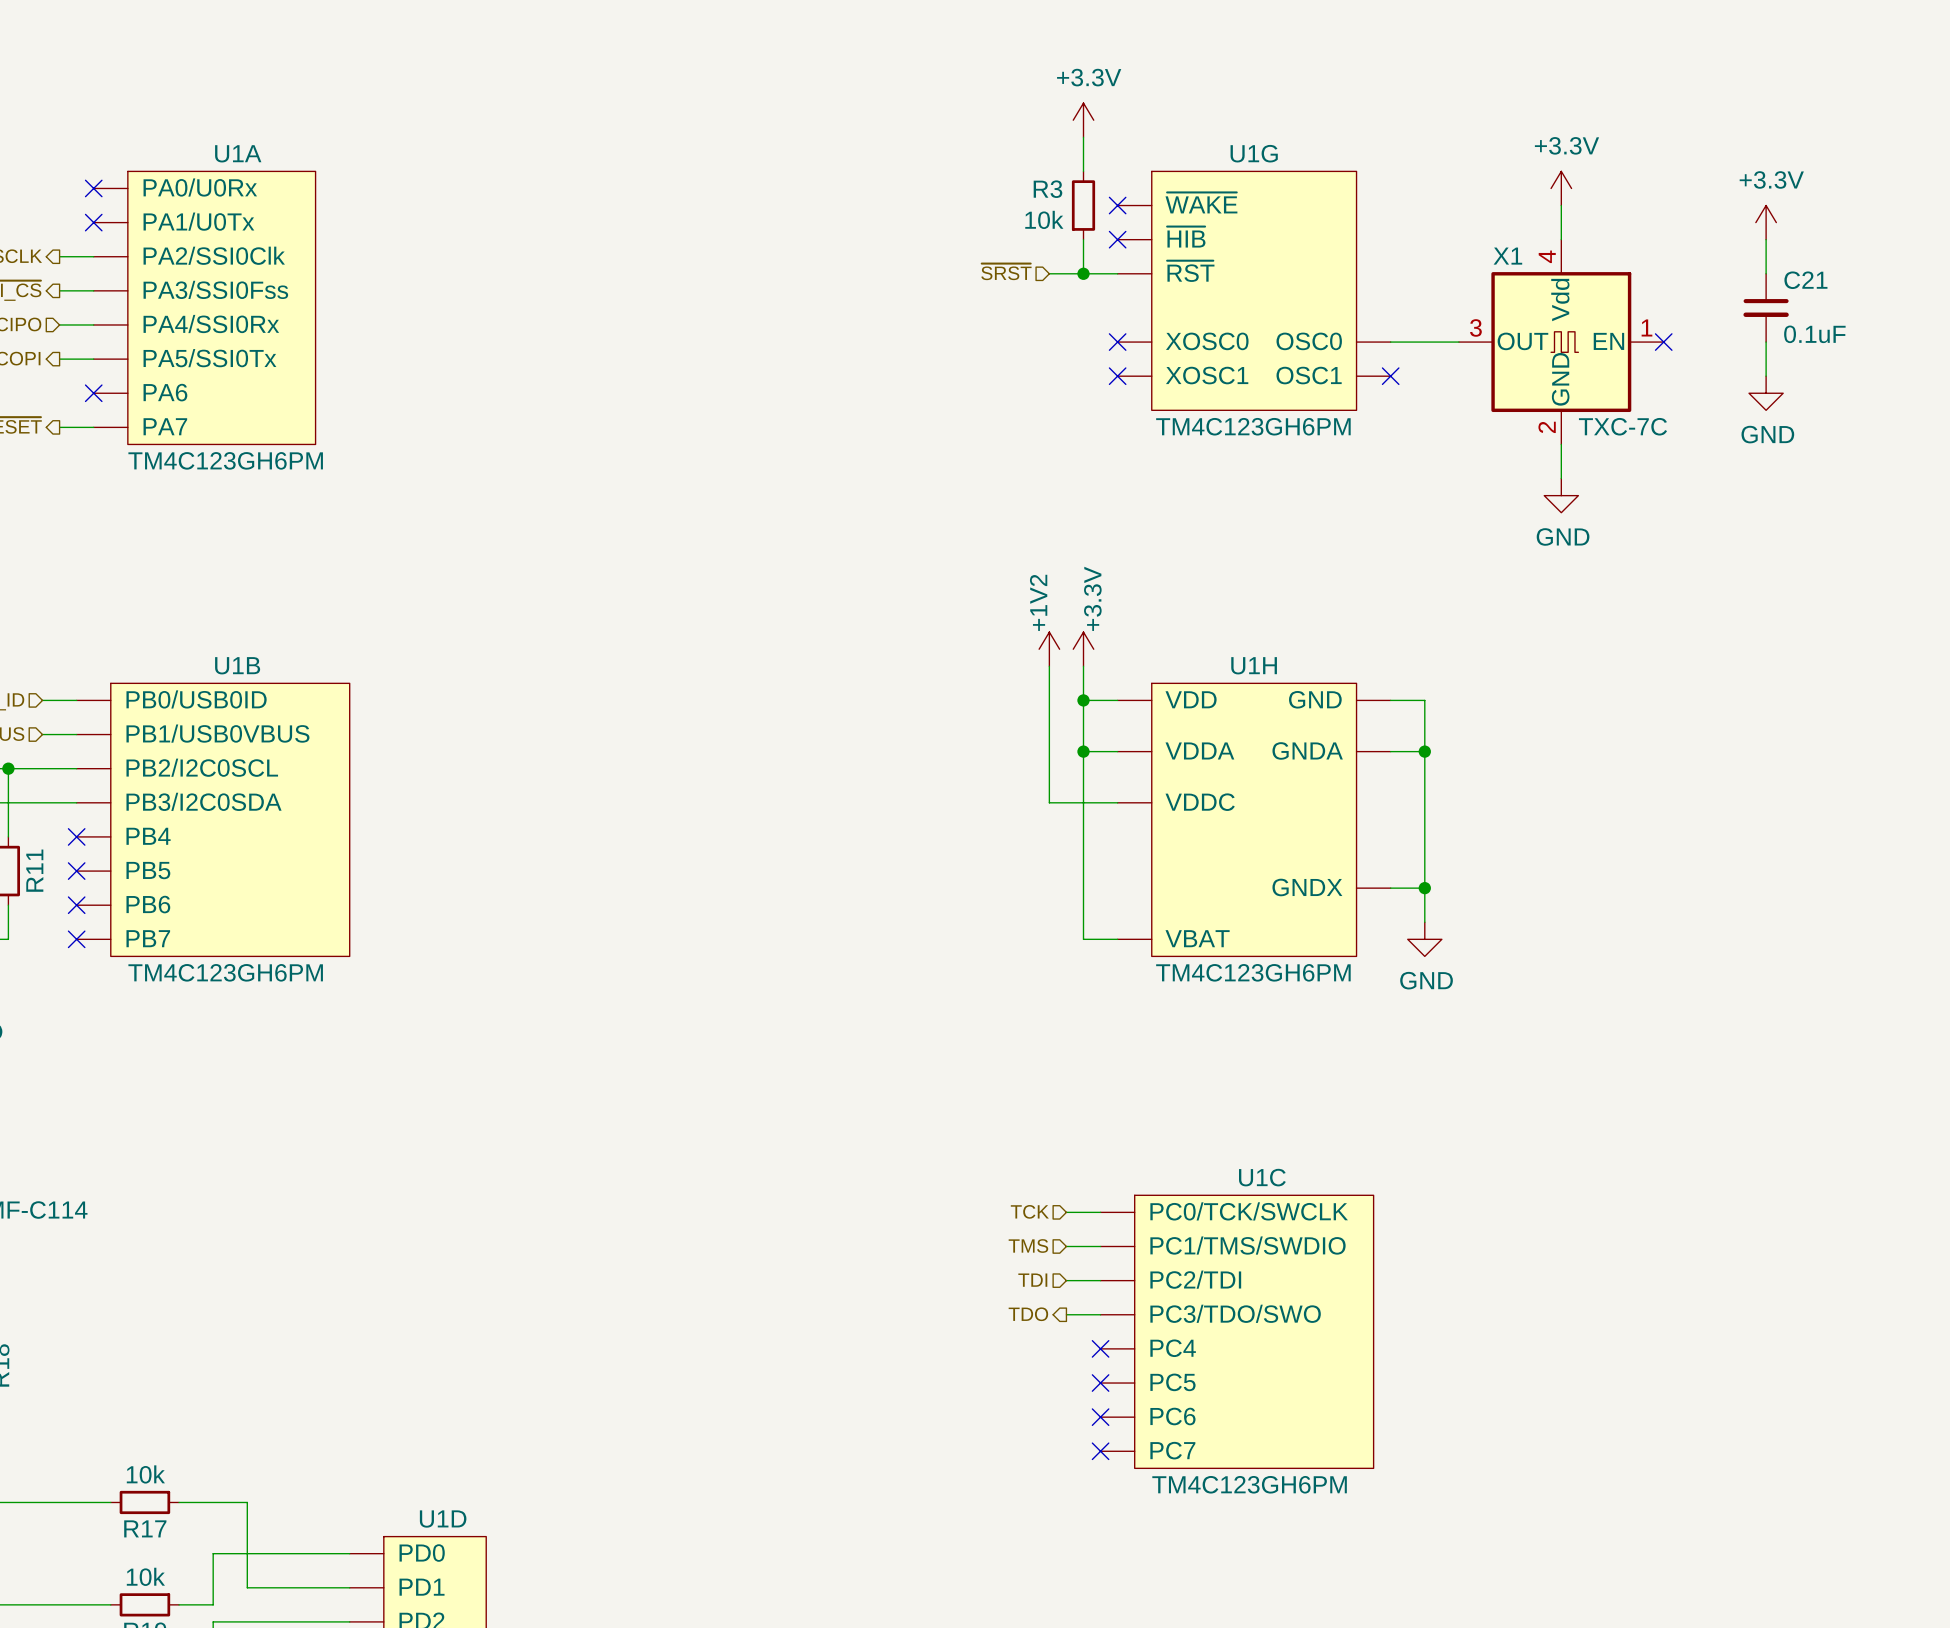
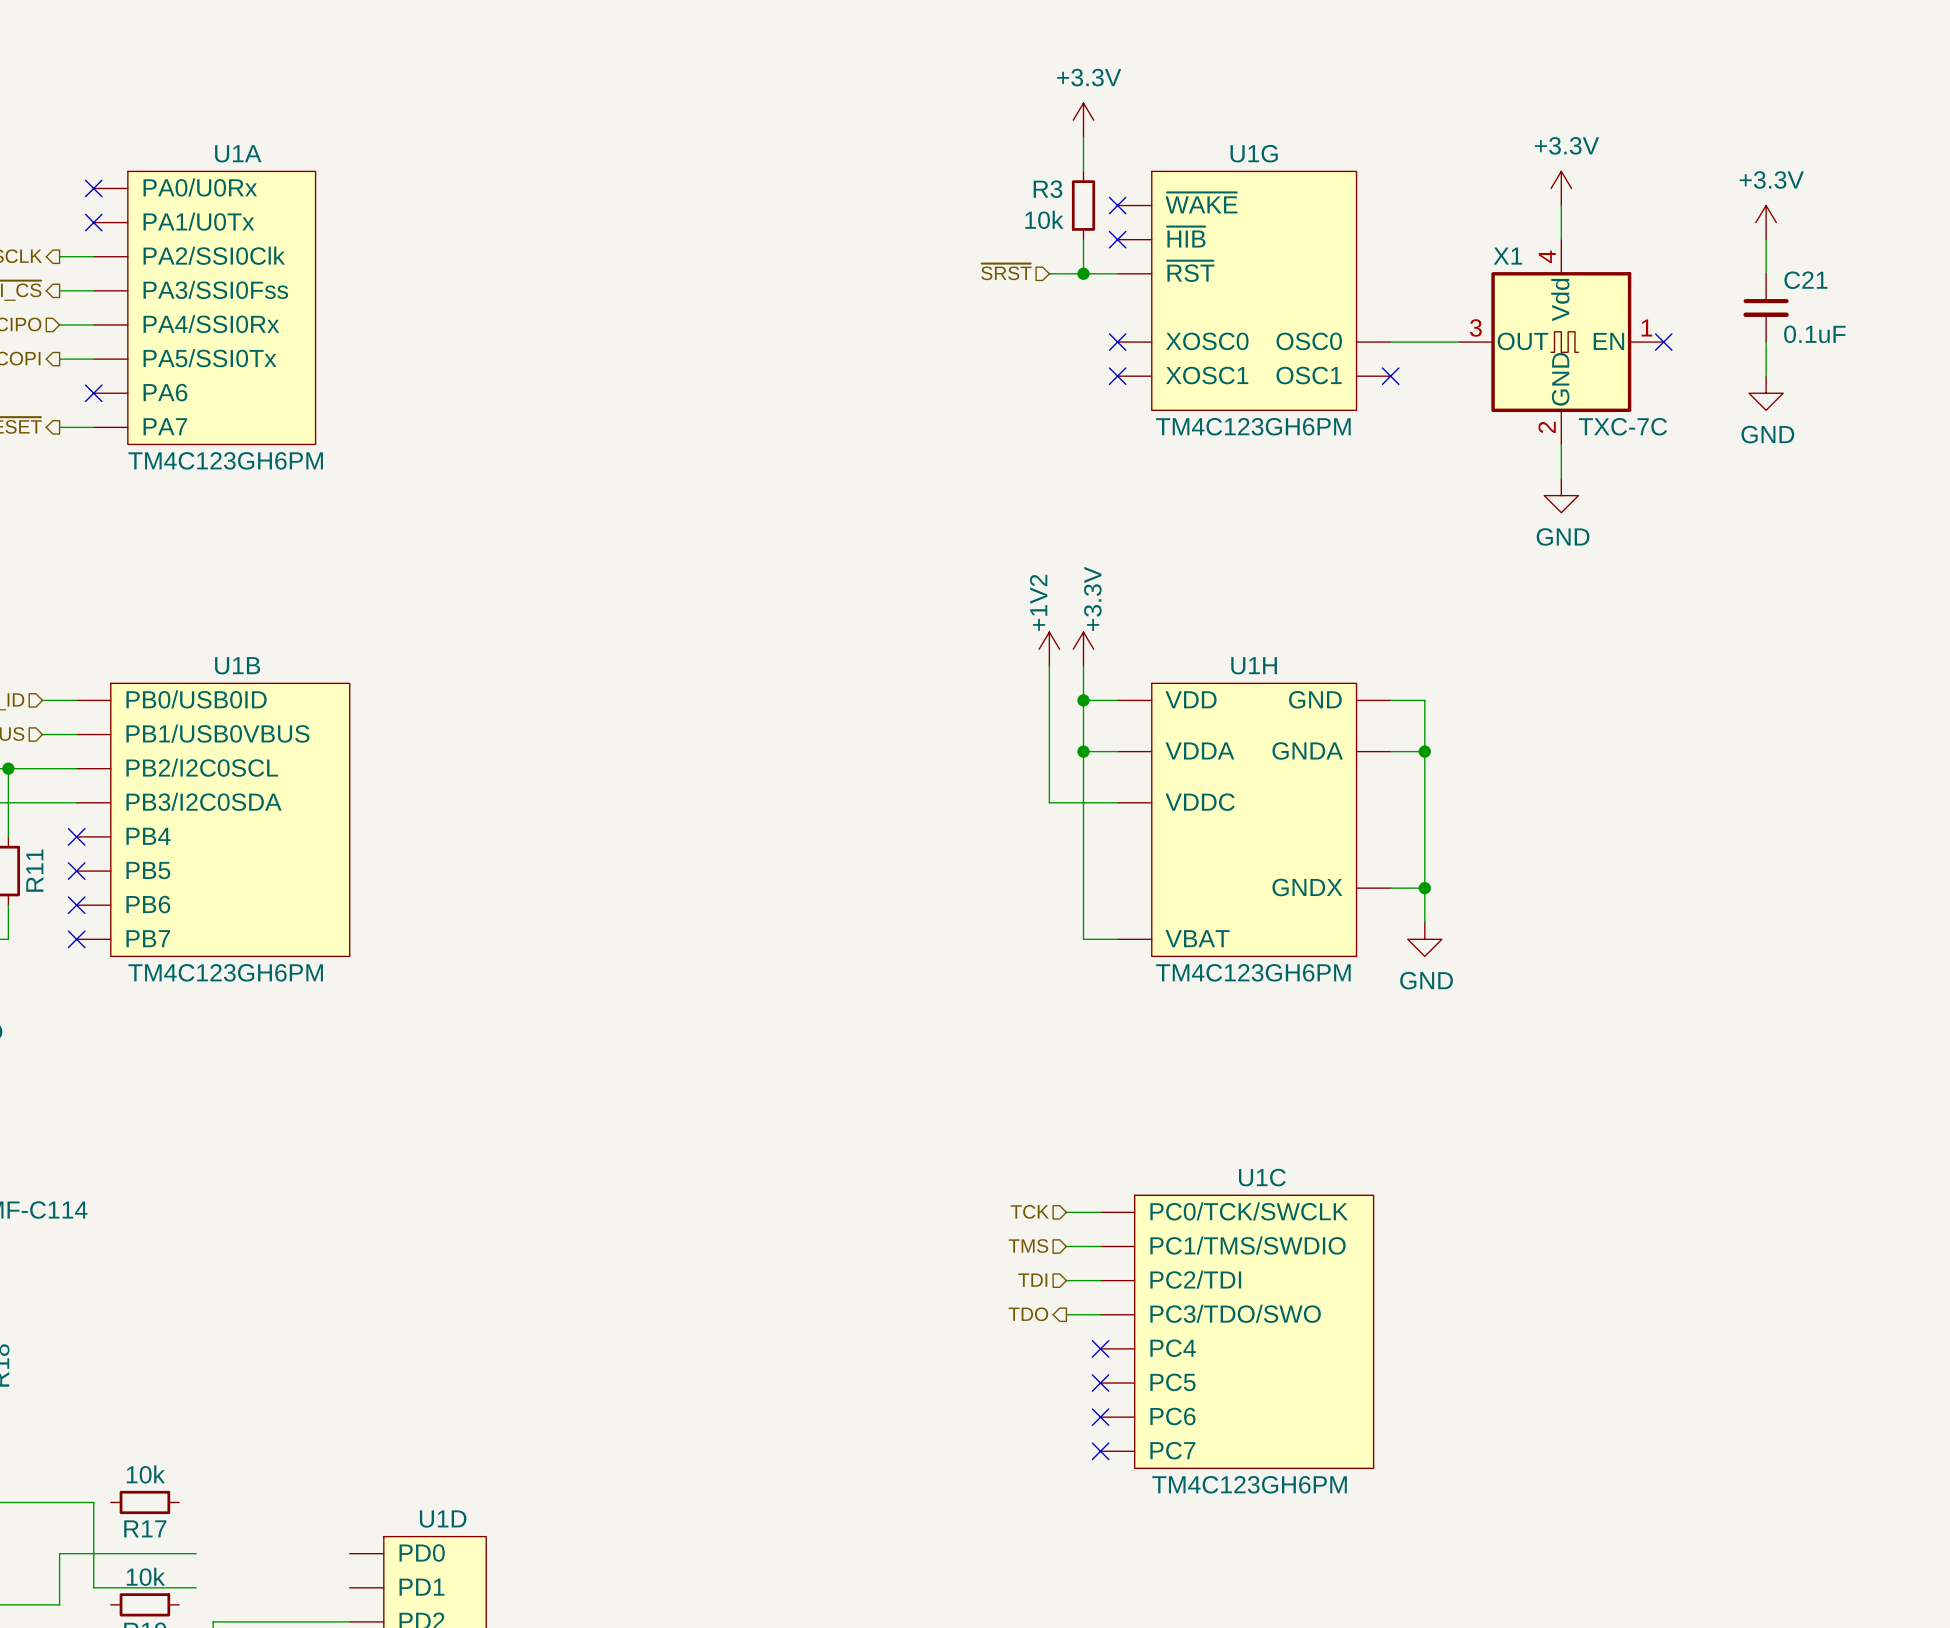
wire: (93, 1502) (110, 1502) -> (93, 1502) (93, 1587) (196, 1587)
wire: (179, 1502) (247, 1502) (247, 1587) (349, 1587) -> none
wire: (349, 1553) (213, 1553) (213, 1604) (179, 1604) -> none
wire: (59, 1604) (110, 1604) -> (59, 1604) (59, 1553) (196, 1553)

